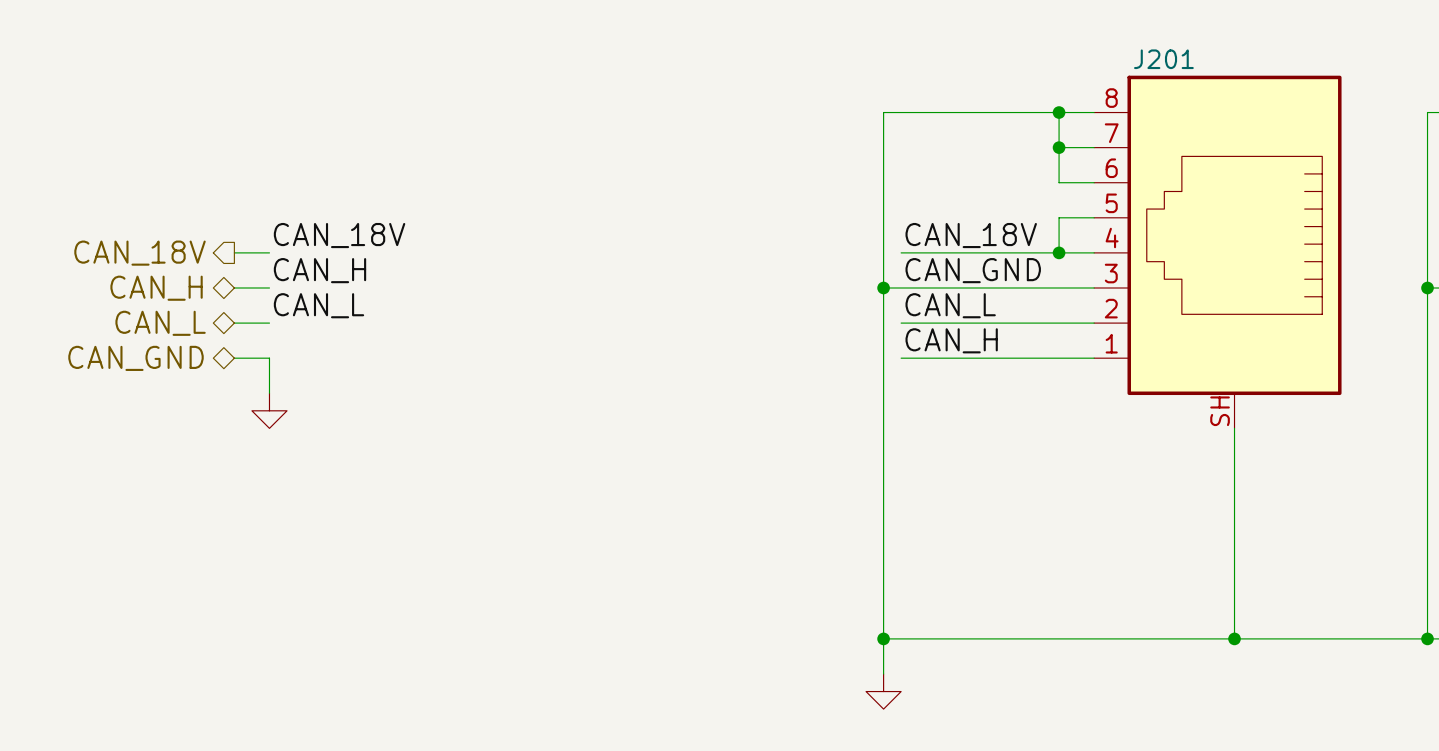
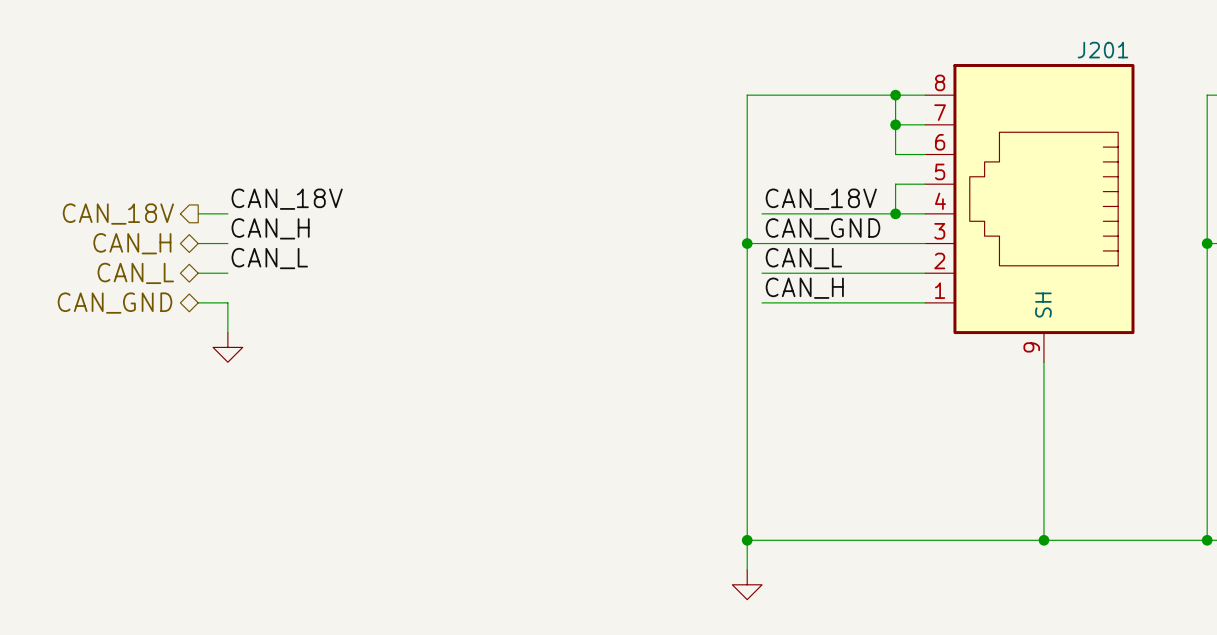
J201 name position: J201 (1163, 59) -> J201 (1102, 50)
J201 pin name: none -> SH (1043, 305)
J201 pin number: SH (1220, 411) -> 9 (1031, 347)

